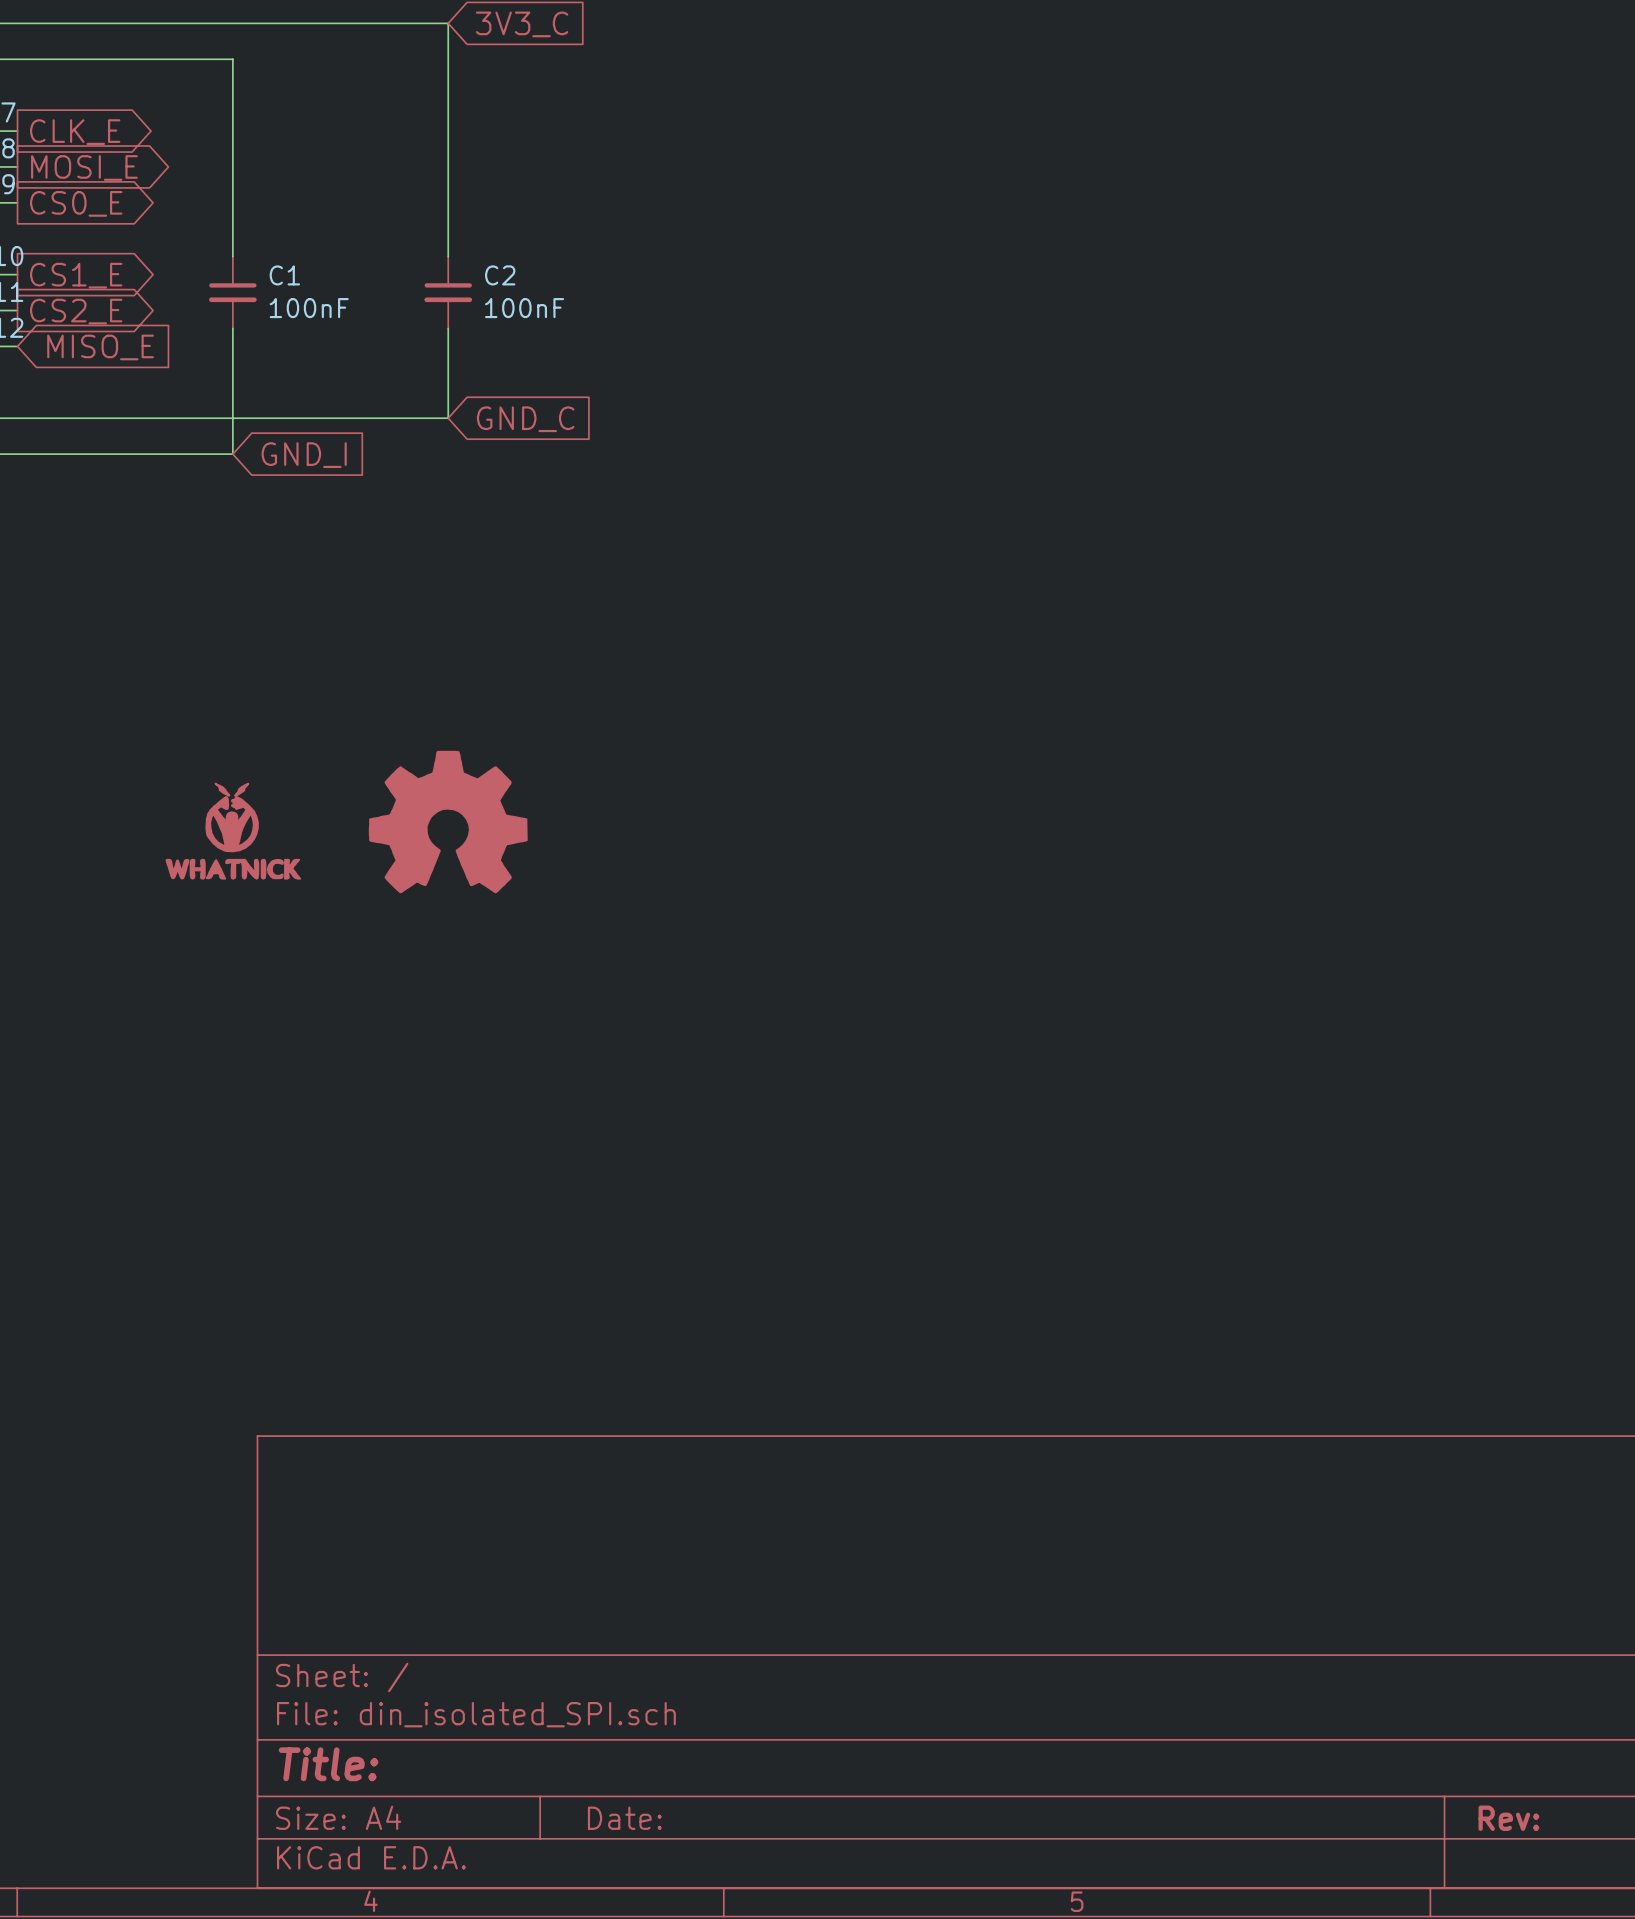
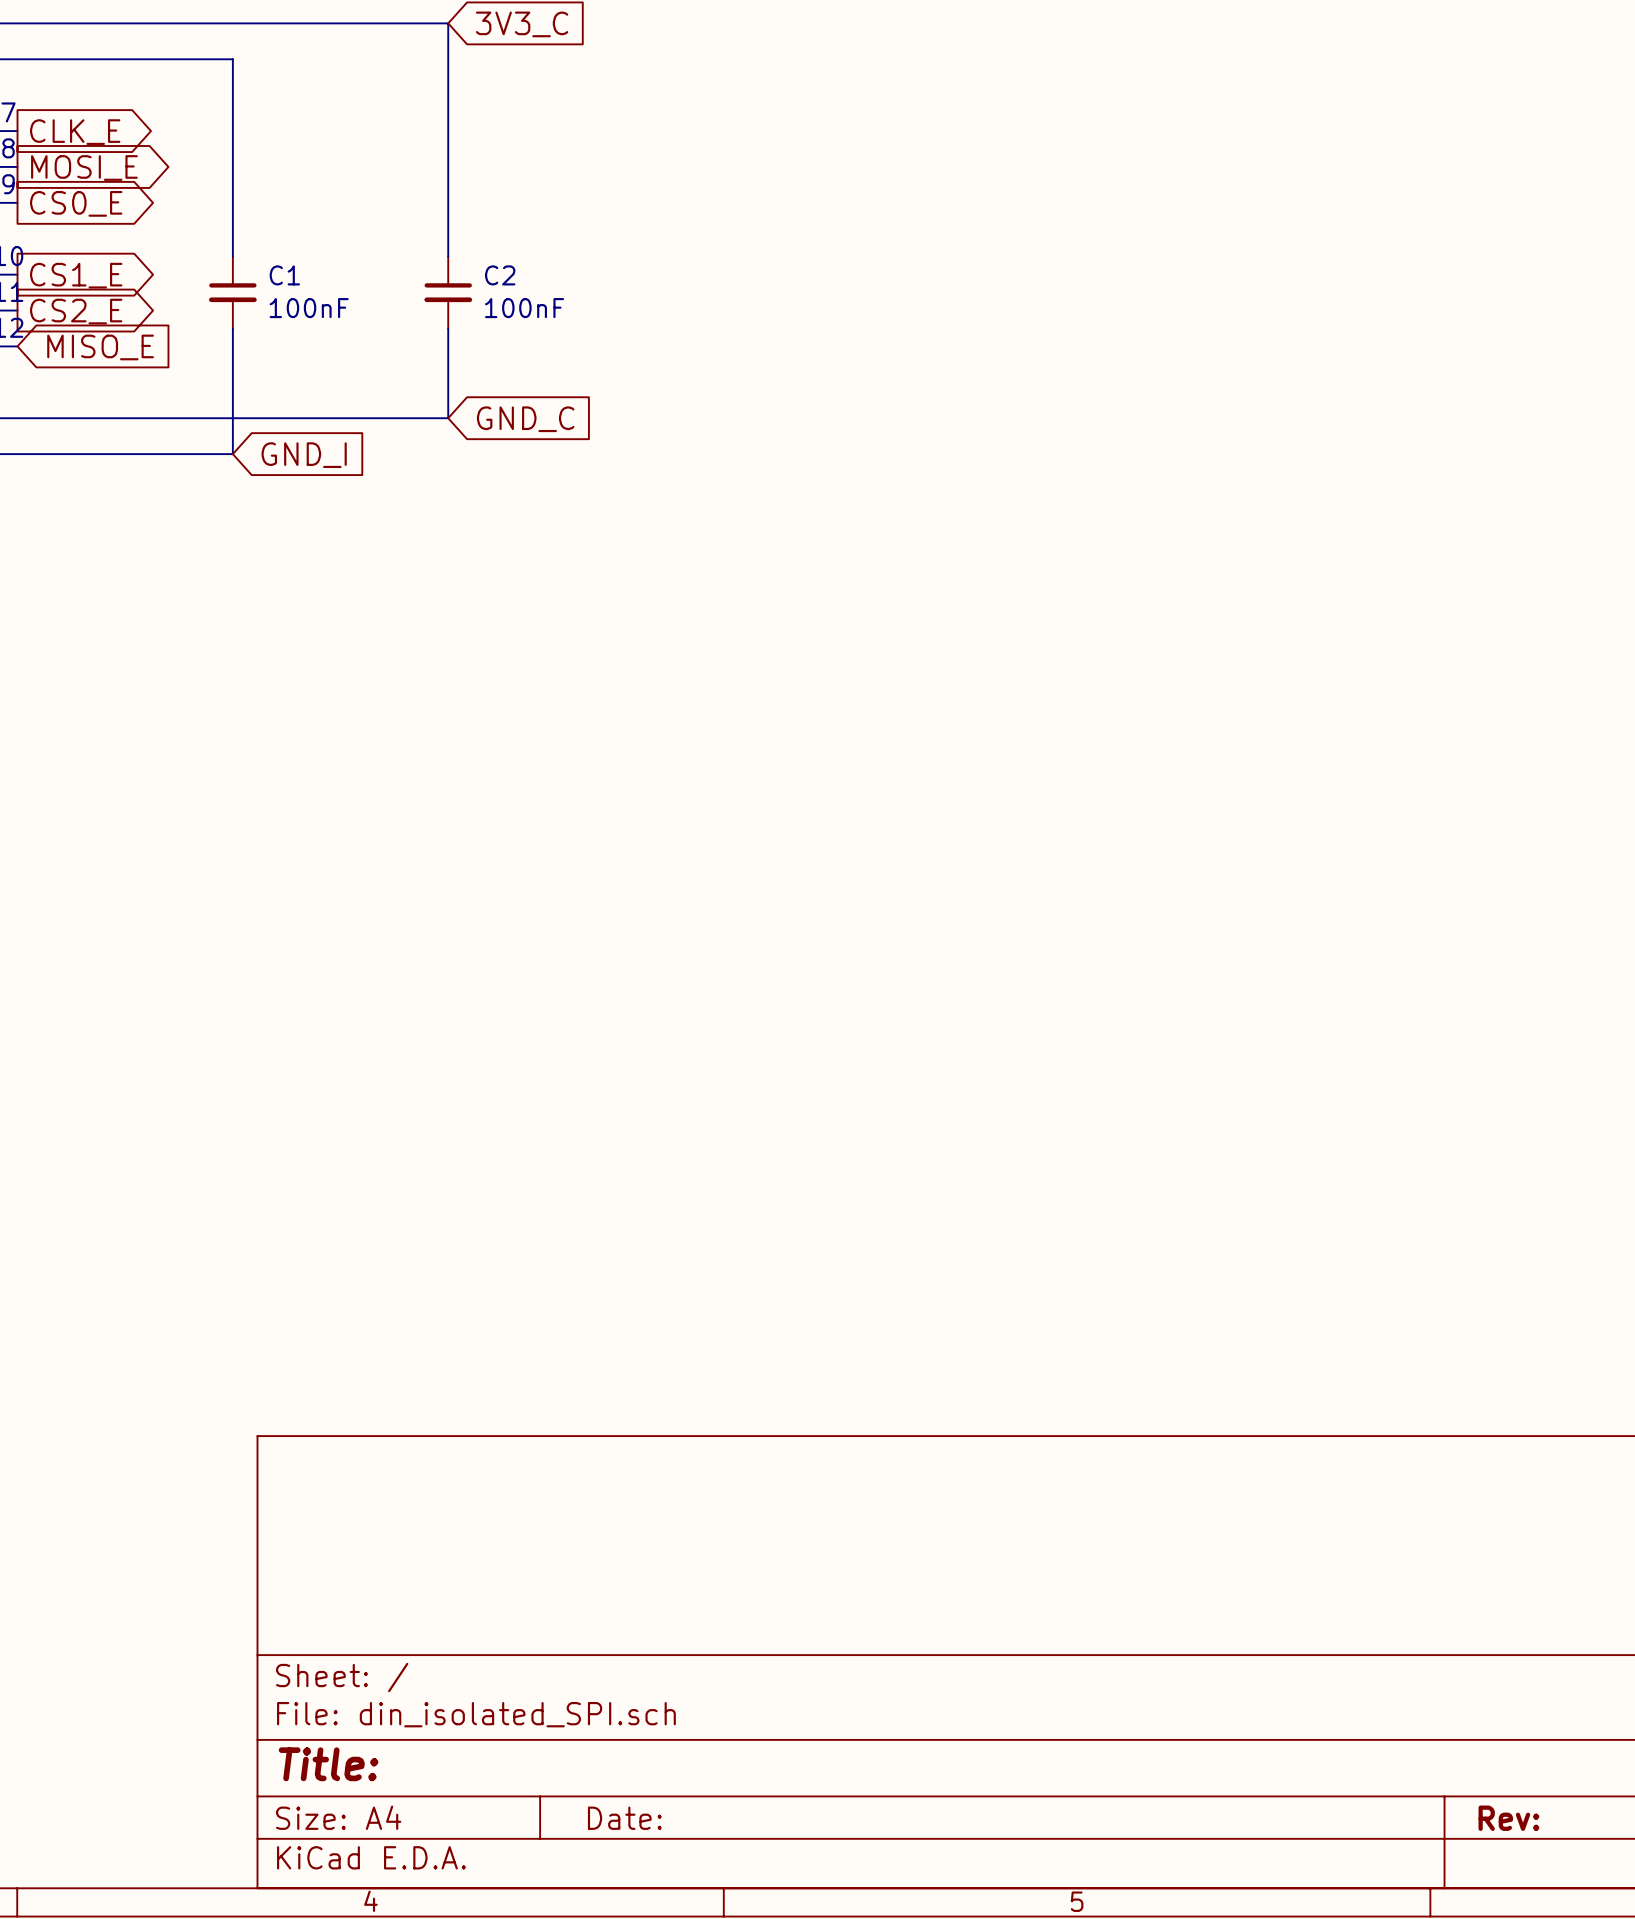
part: (448, 822) -> none
part: (233, 831) -> none

